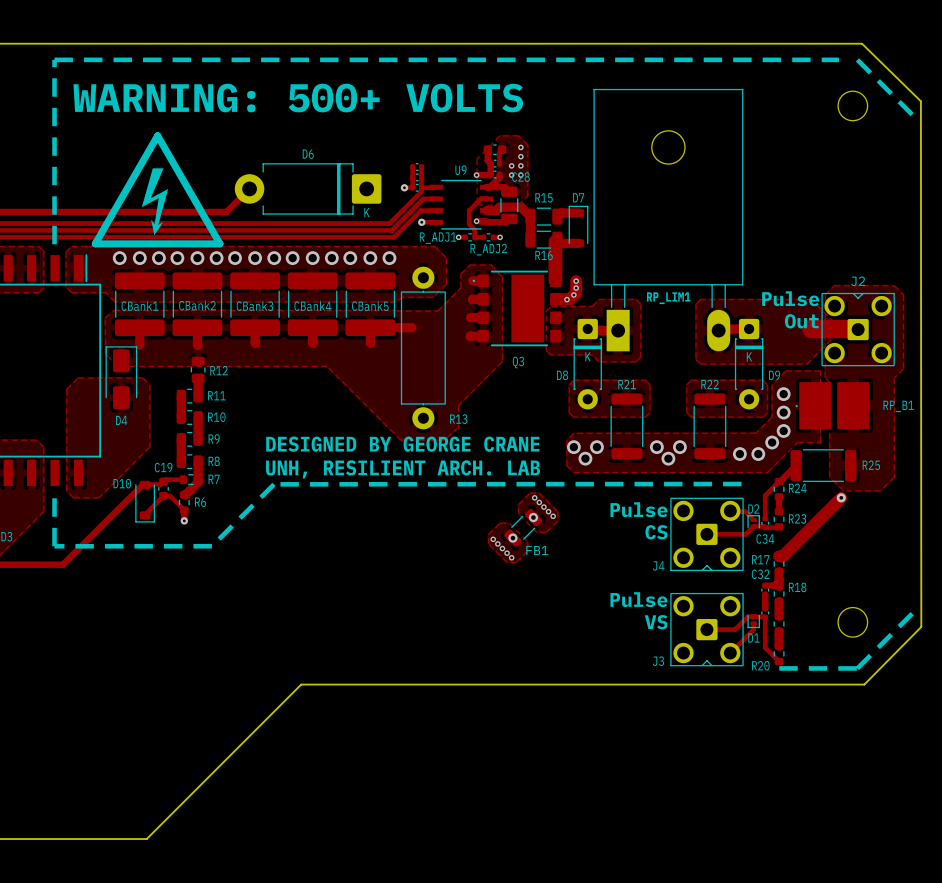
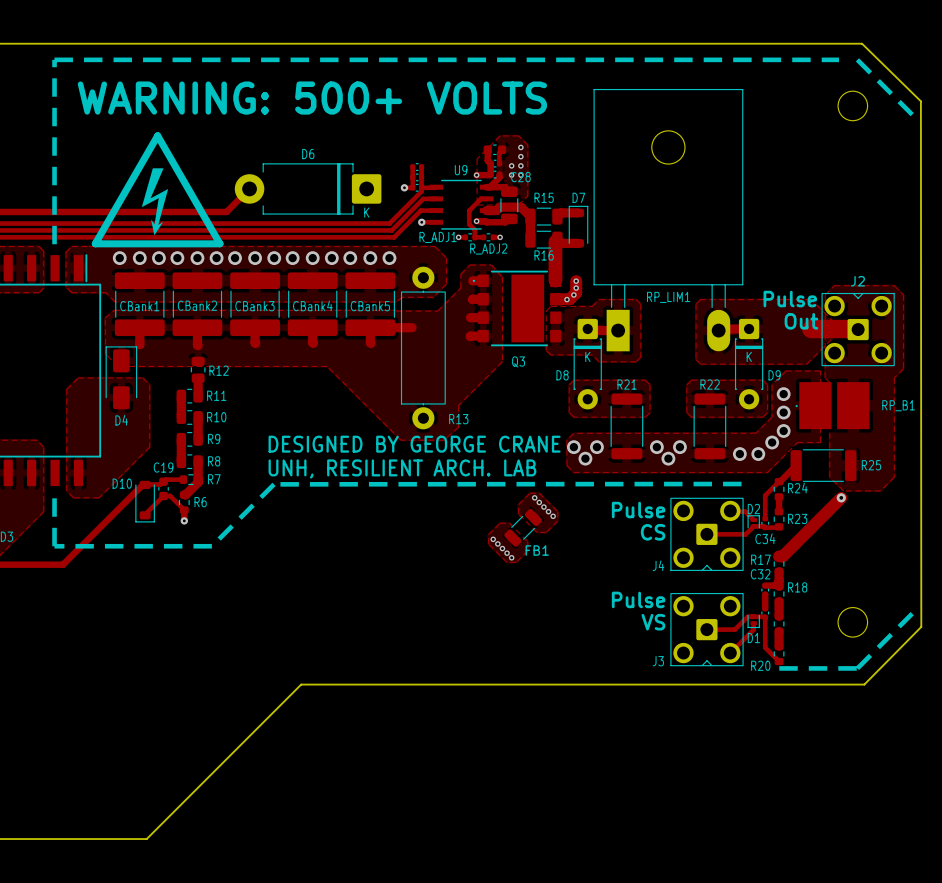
via: (533, 517) -> none
via: (512, 538) -> none

